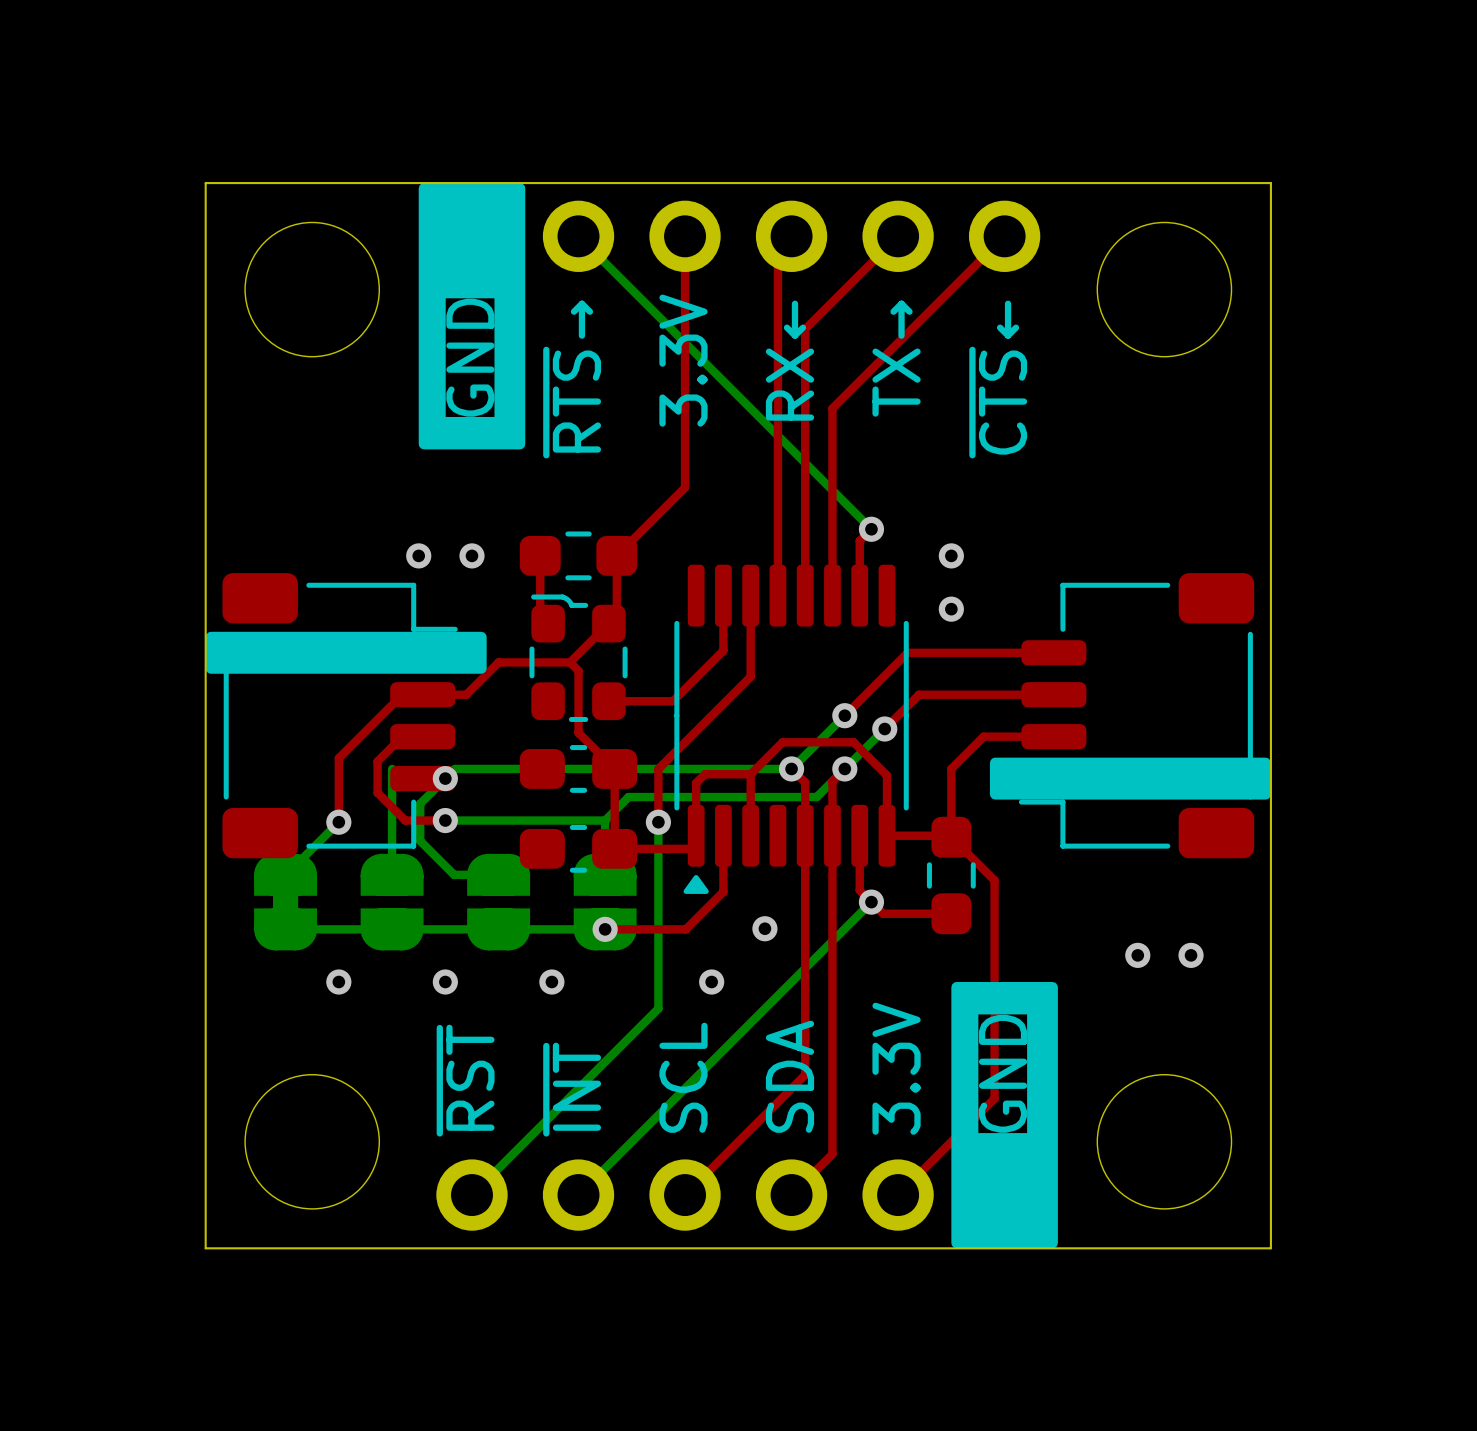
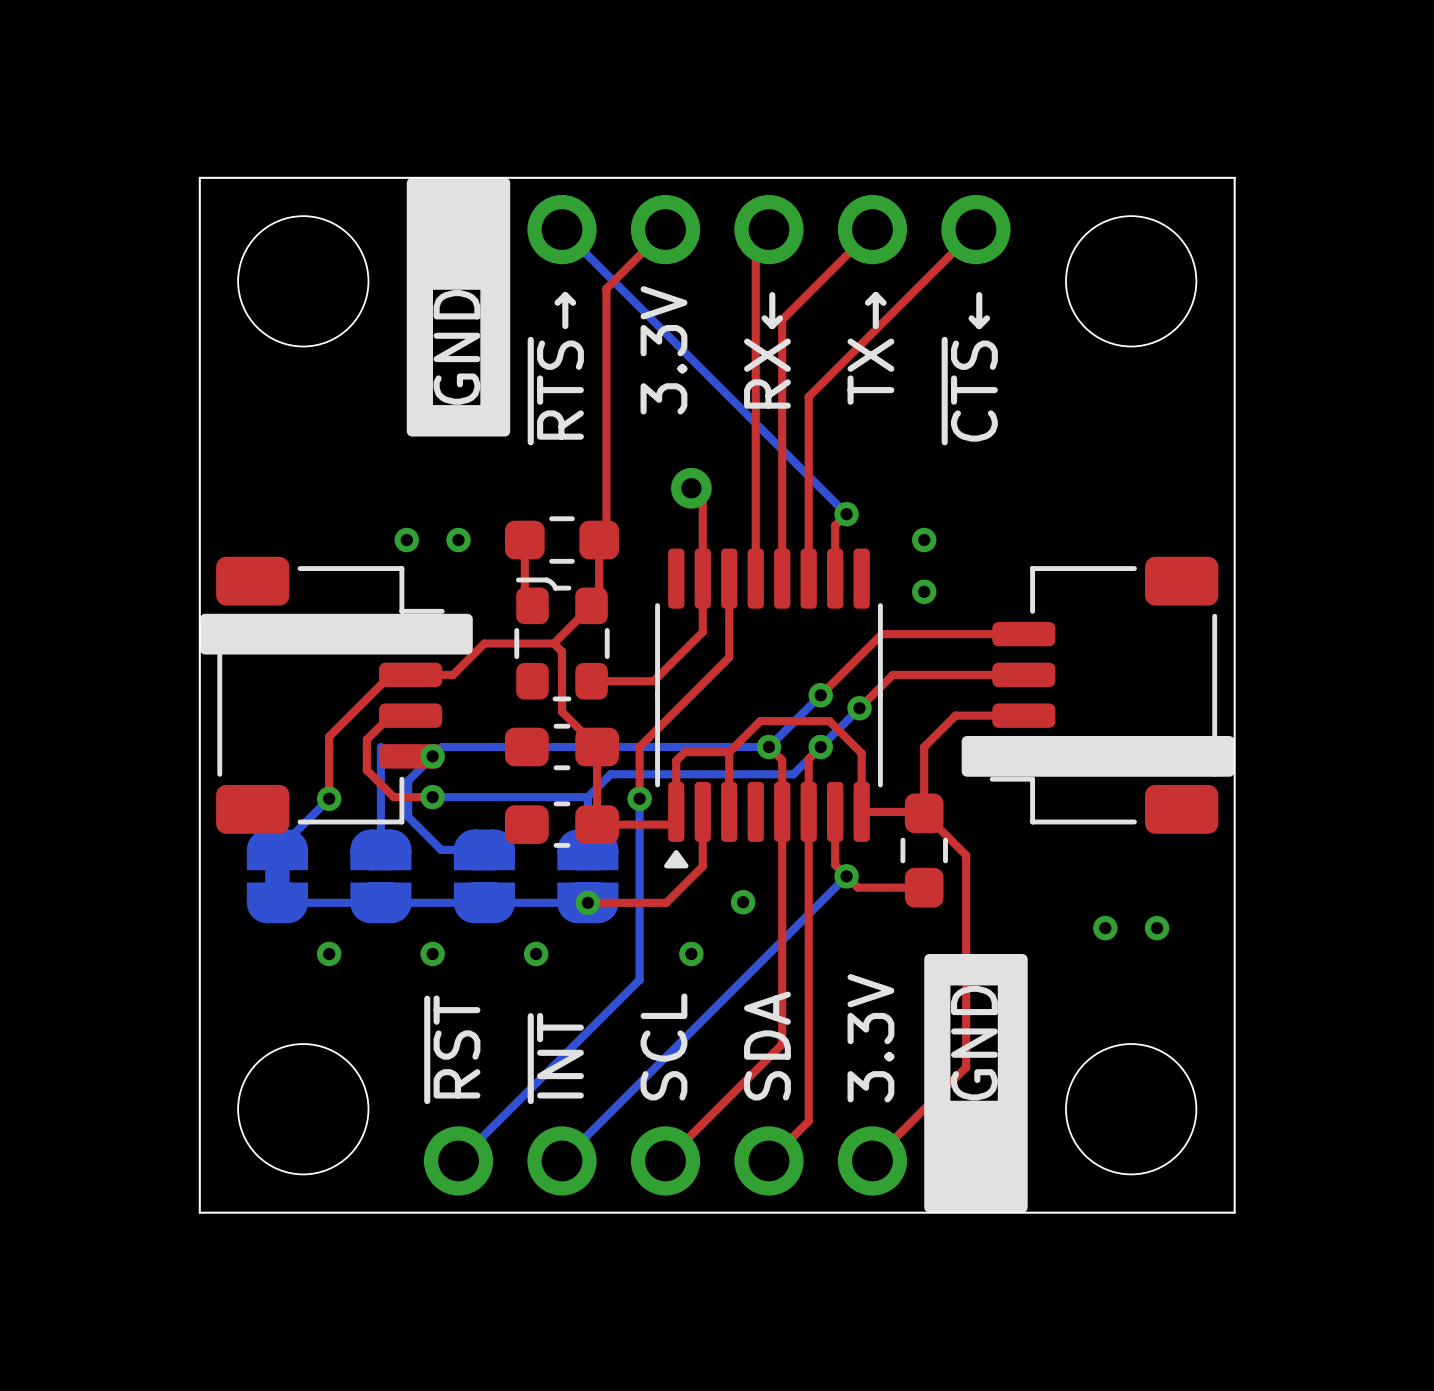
top track: (685, 236) (685, 487) (624, 548) -> (665, 229) (606, 288) (606, 532)
top track: none -> (691, 488) (702, 499) (702, 578)
part: none -> (691, 488)

